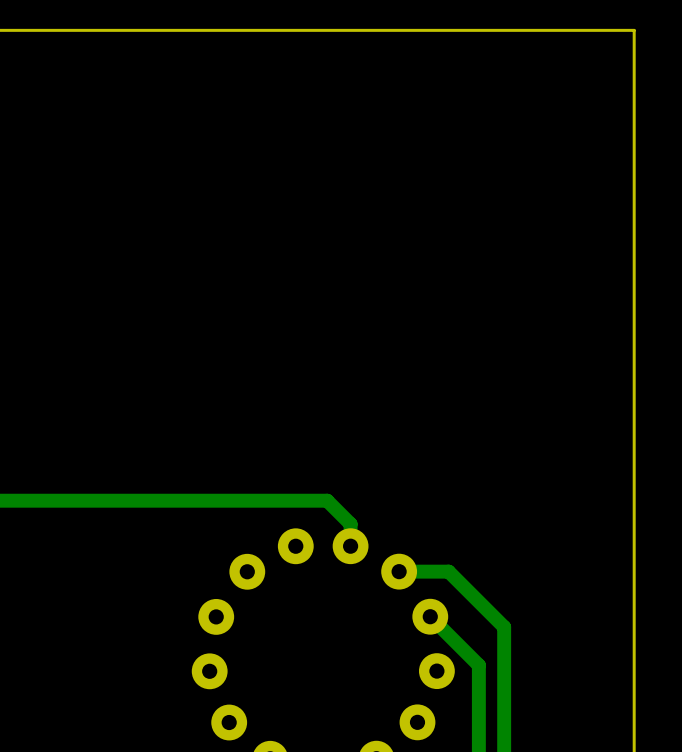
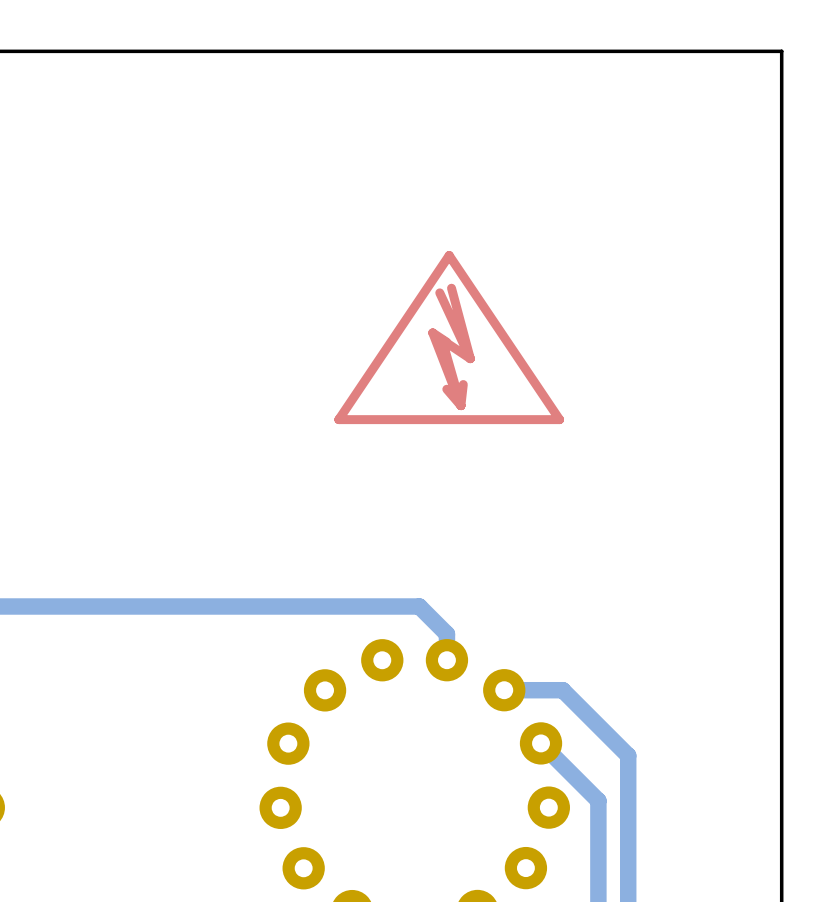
drawing: none -> [334, 251, 565, 425]

